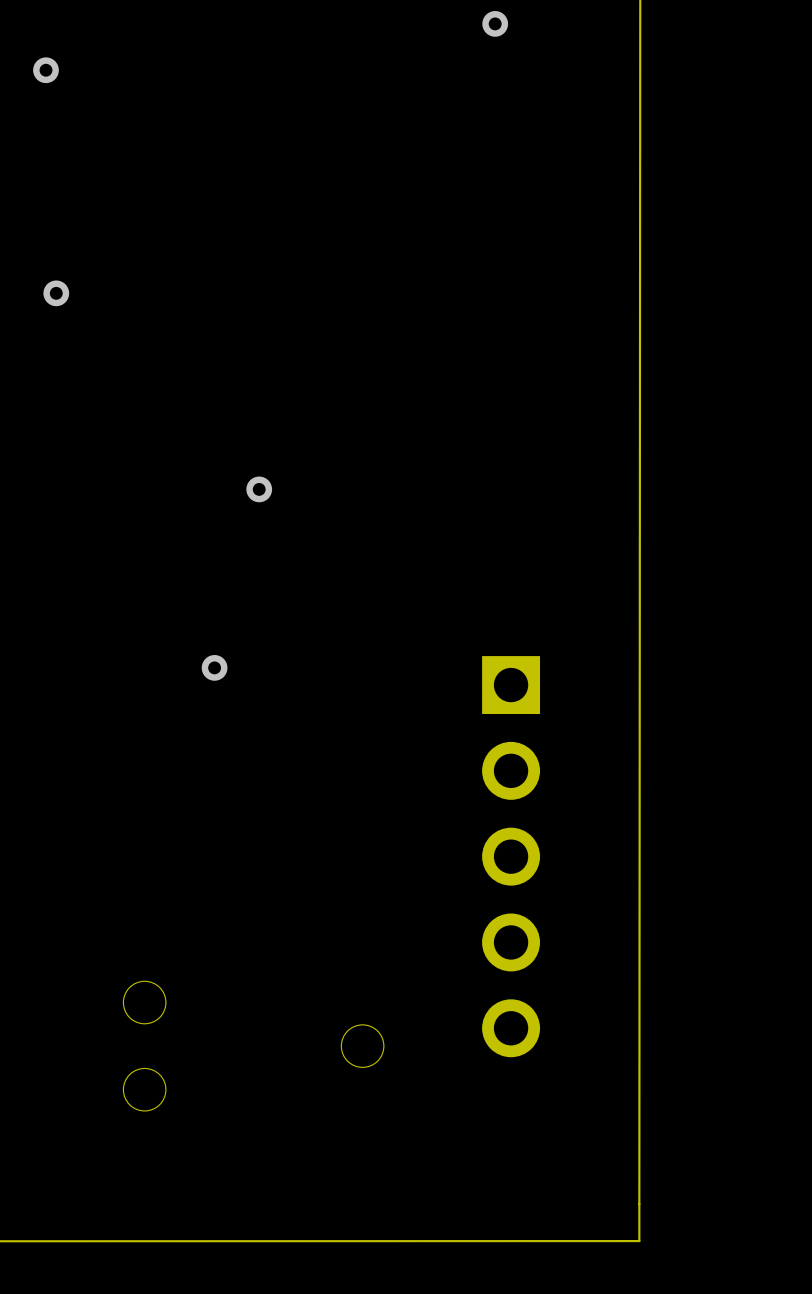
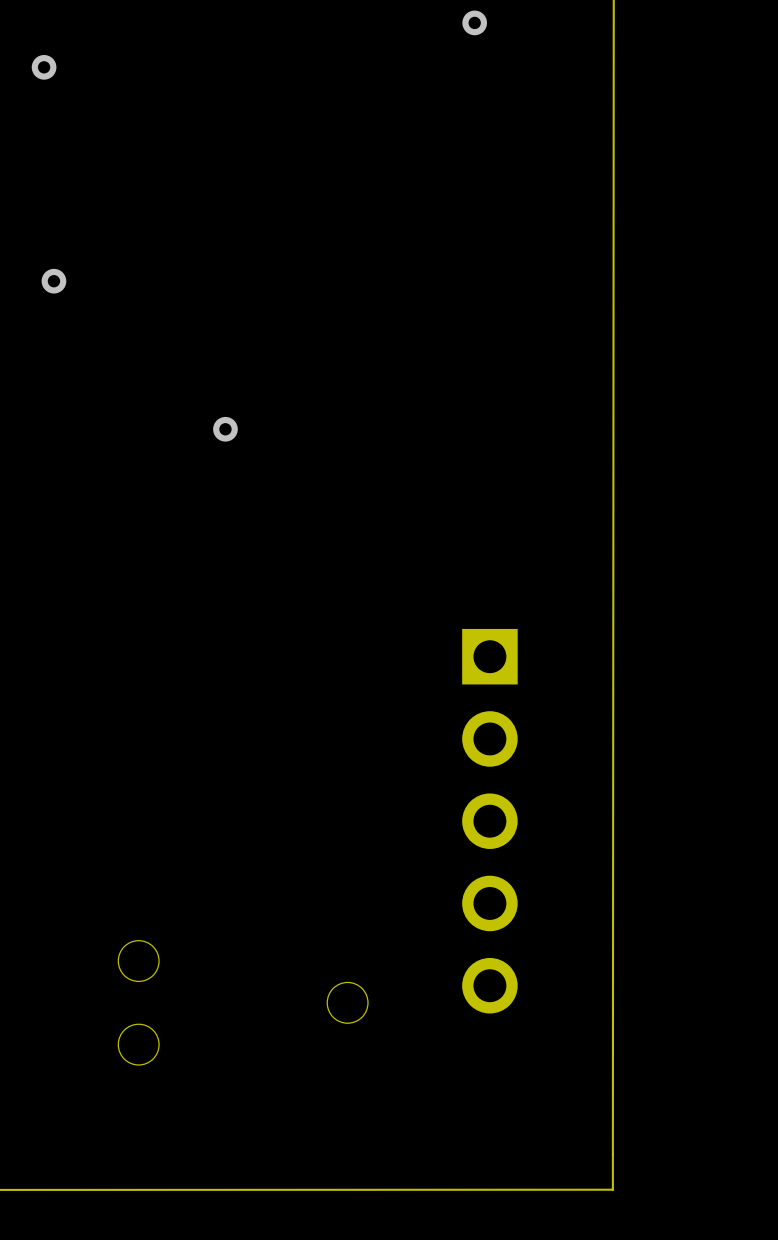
via position: (259, 489) -> (225, 429)
via: (214, 667) -> none

